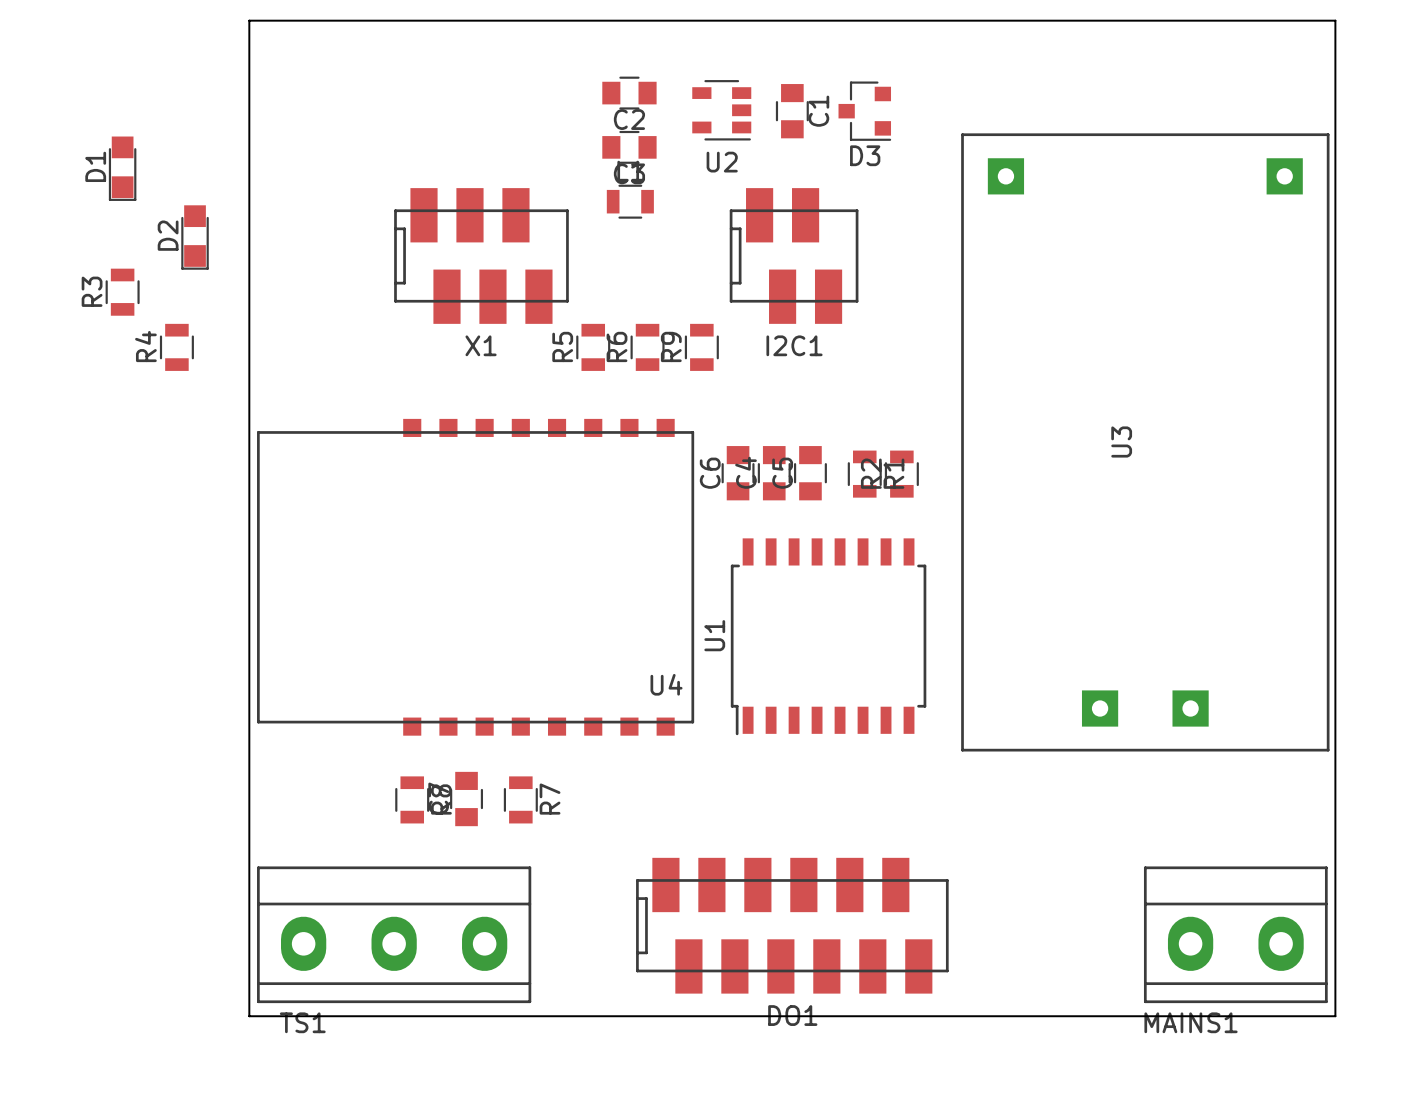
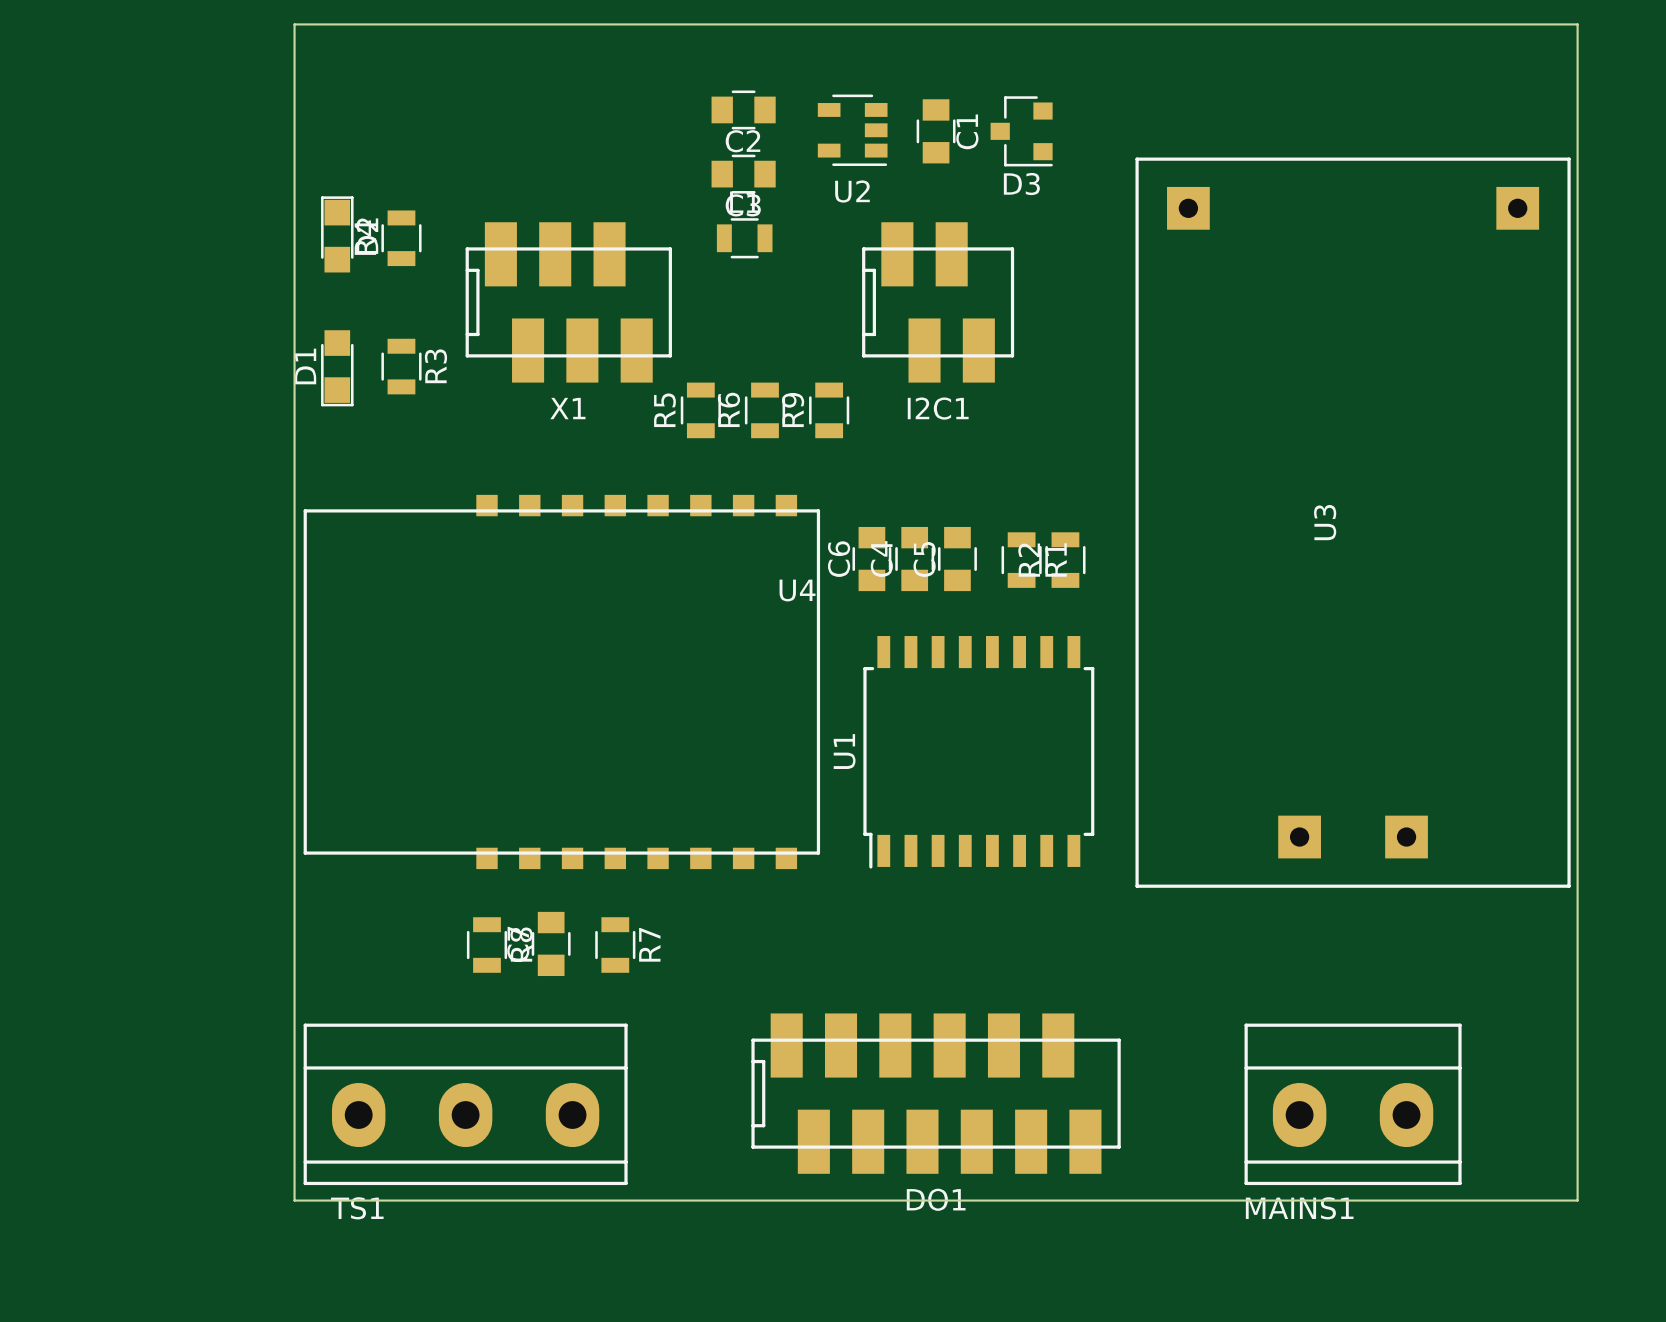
D1 position: (122, 168) -> (337, 368)
D2 rotation: 0° (195, 237) -> 180° (337, 234)
D2 position: (195, 237) -> (337, 234)
R3 name position: R3 (92, 291) -> R3 (435, 366)
R3 position: (122, 292) -> (401, 366)
R4 position: (176, 347) -> (401, 238)
U4 name position: U4 (666, 684) -> U4 (797, 590)
MAINS1 position: (1235, 934) -> (1353, 1104)

